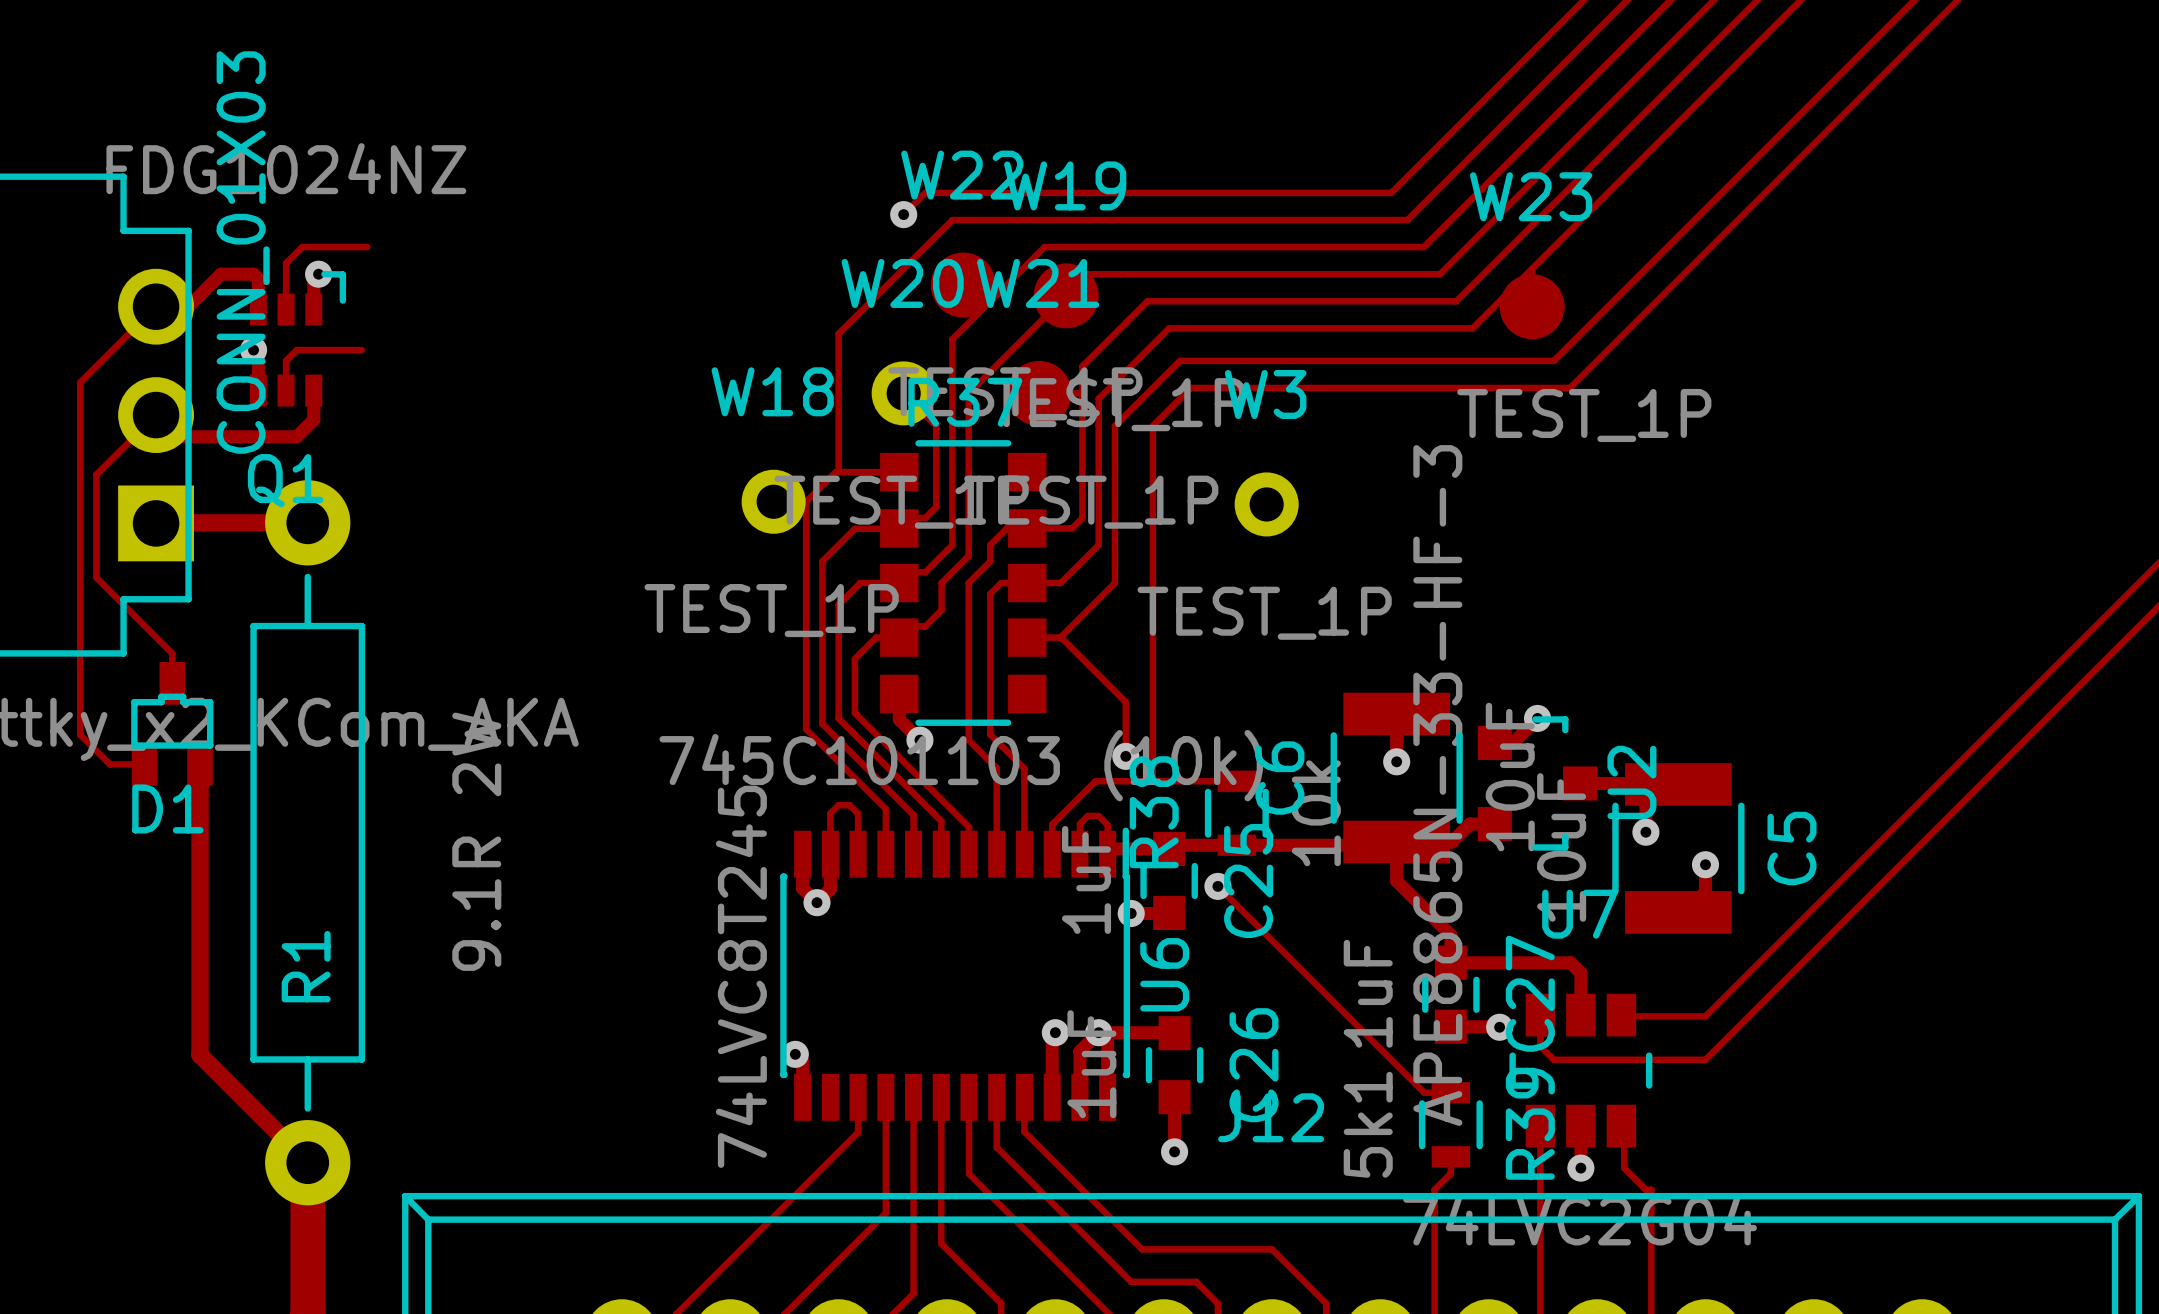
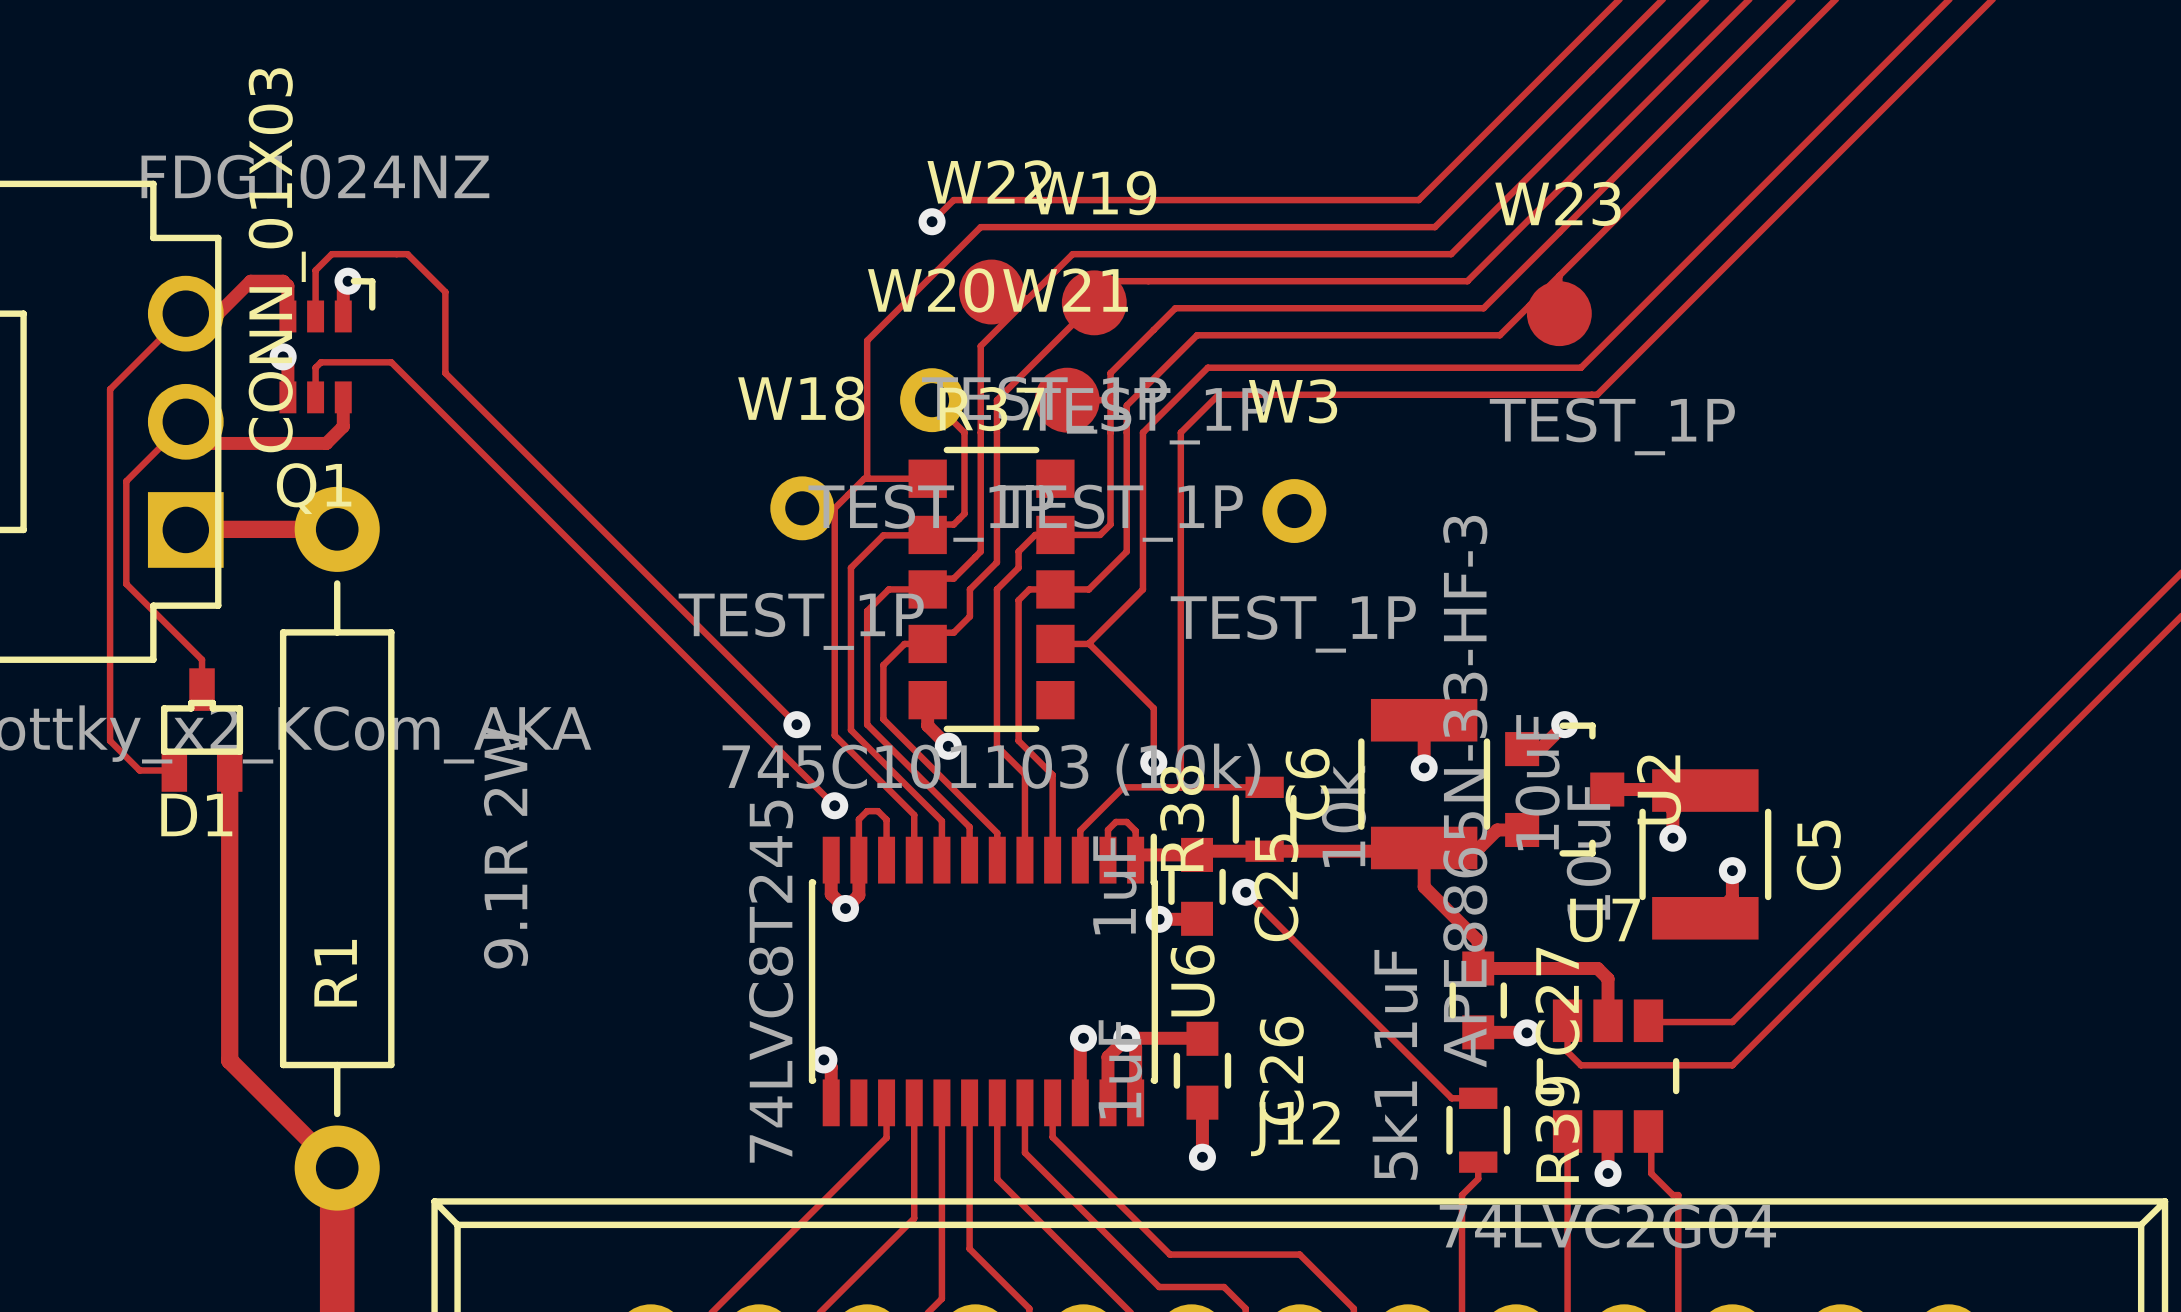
track: none -> (396, 254) (407, 254) (445, 292) (445, 373) (796, 724)
track: (361, 350) (296, 350) (291, 355) -> (834, 805) (391, 362) (320, 362)
via: none -> (796, 724)
via: none -> (834, 805)

